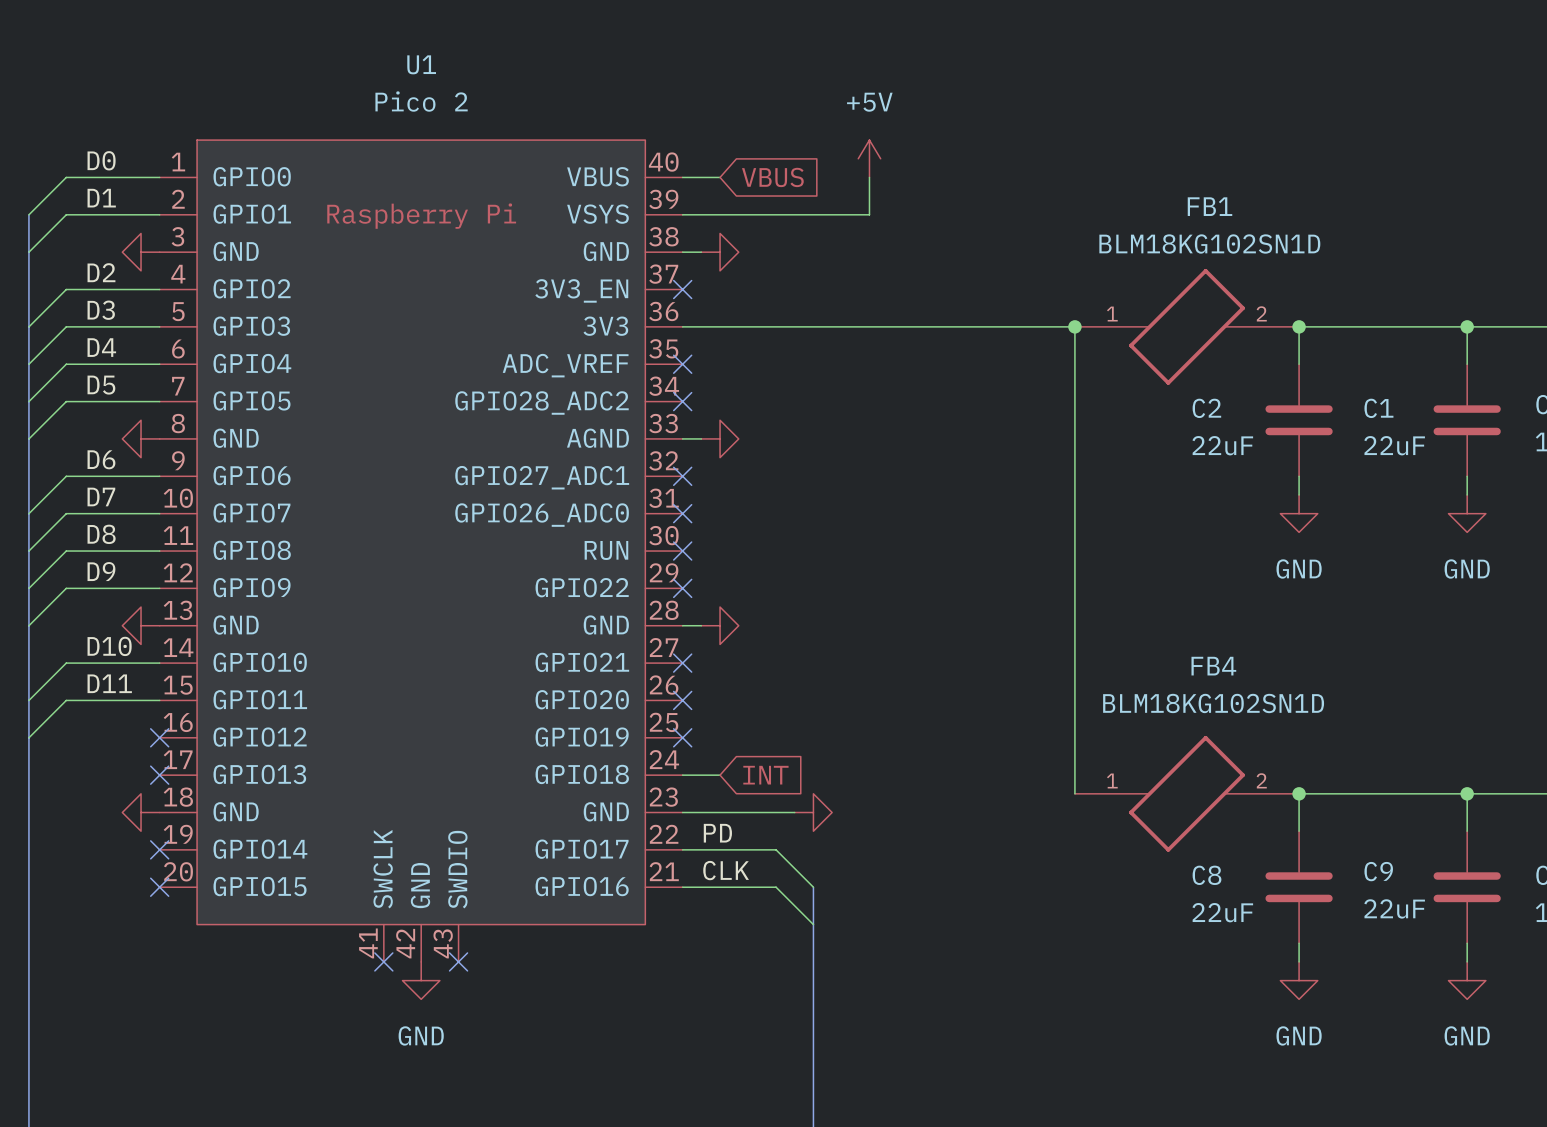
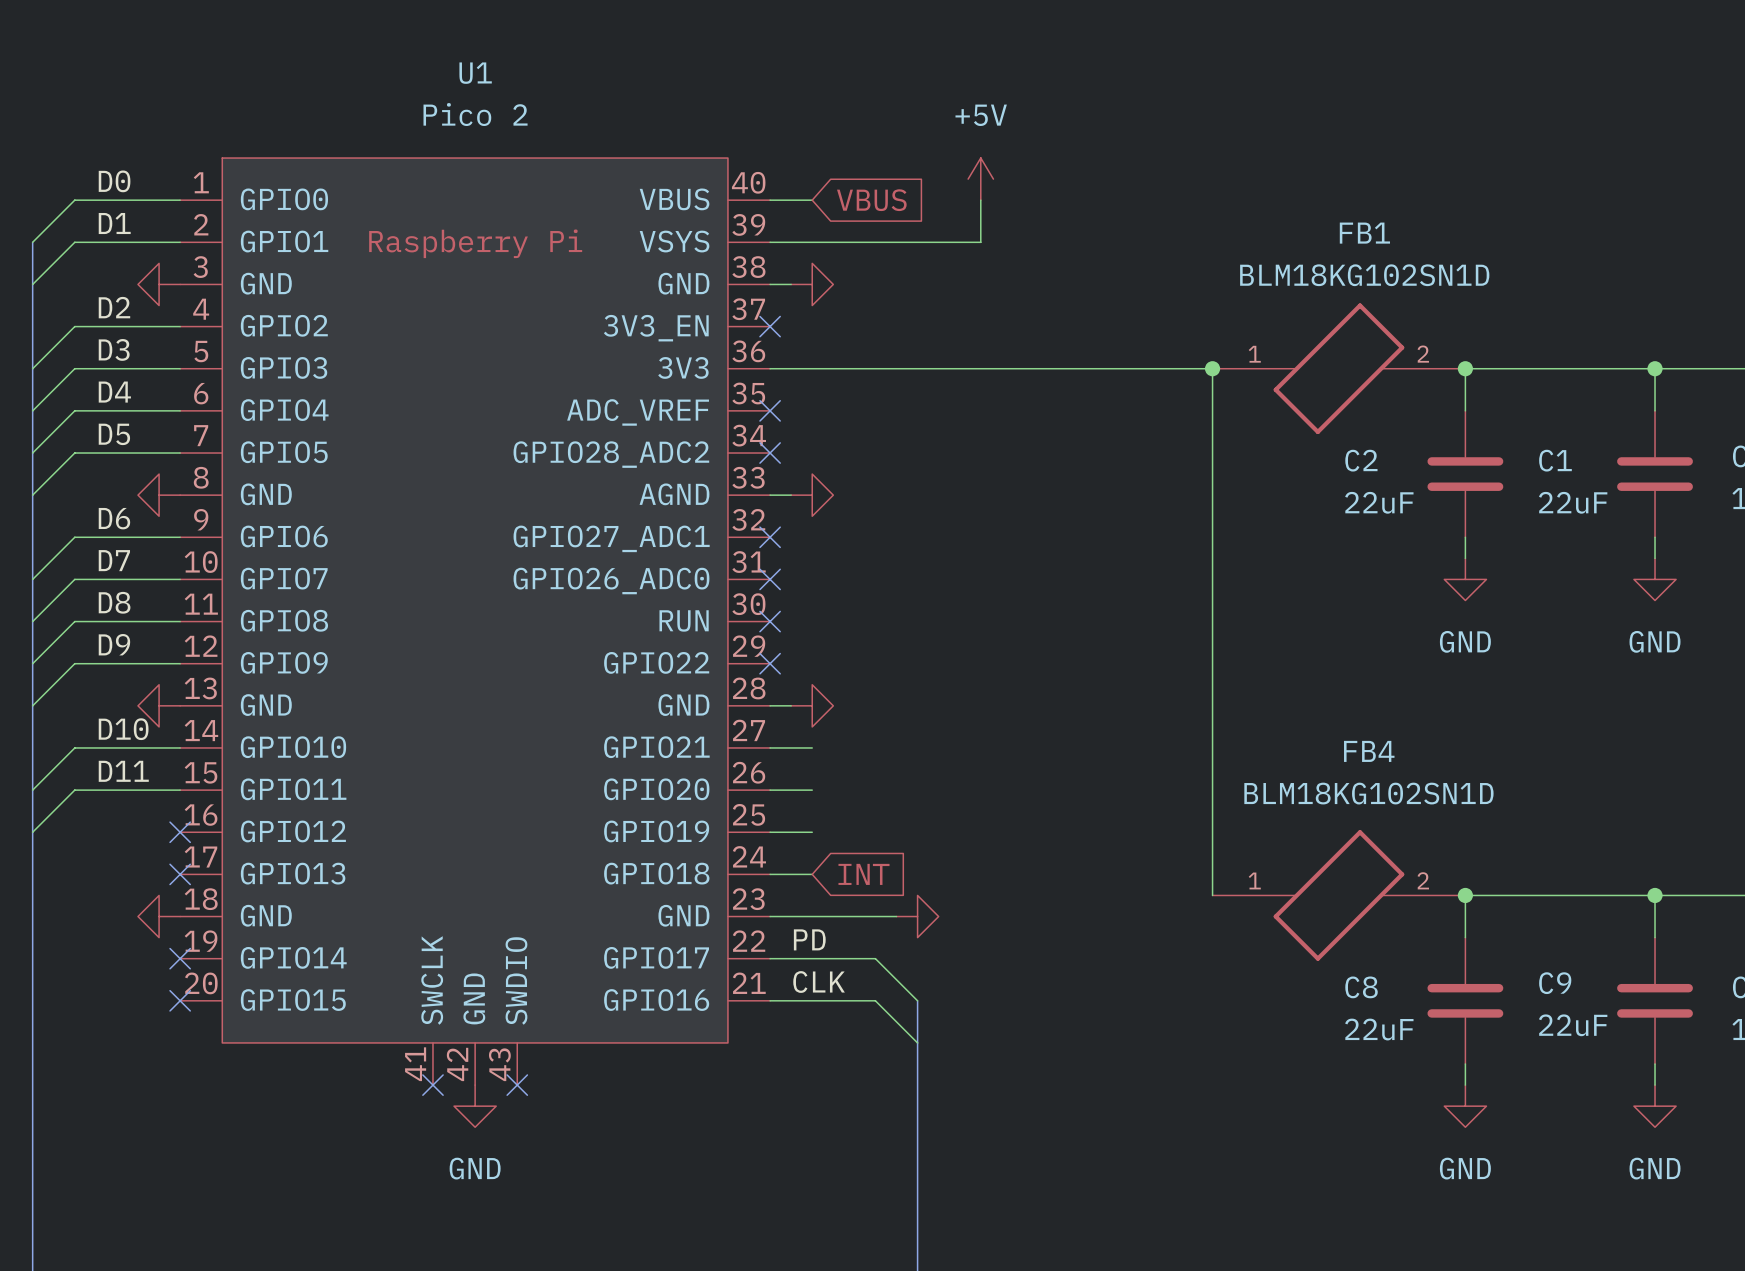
wire: none -> (770, 747) (812, 747)
no-connect mark: (682, 663) -> none
wire: none -> (770, 790) (812, 790)
no-connect mark: (682, 700) -> none
wire: none -> (770, 832) (812, 832)
no-connect mark: (682, 737) -> none

